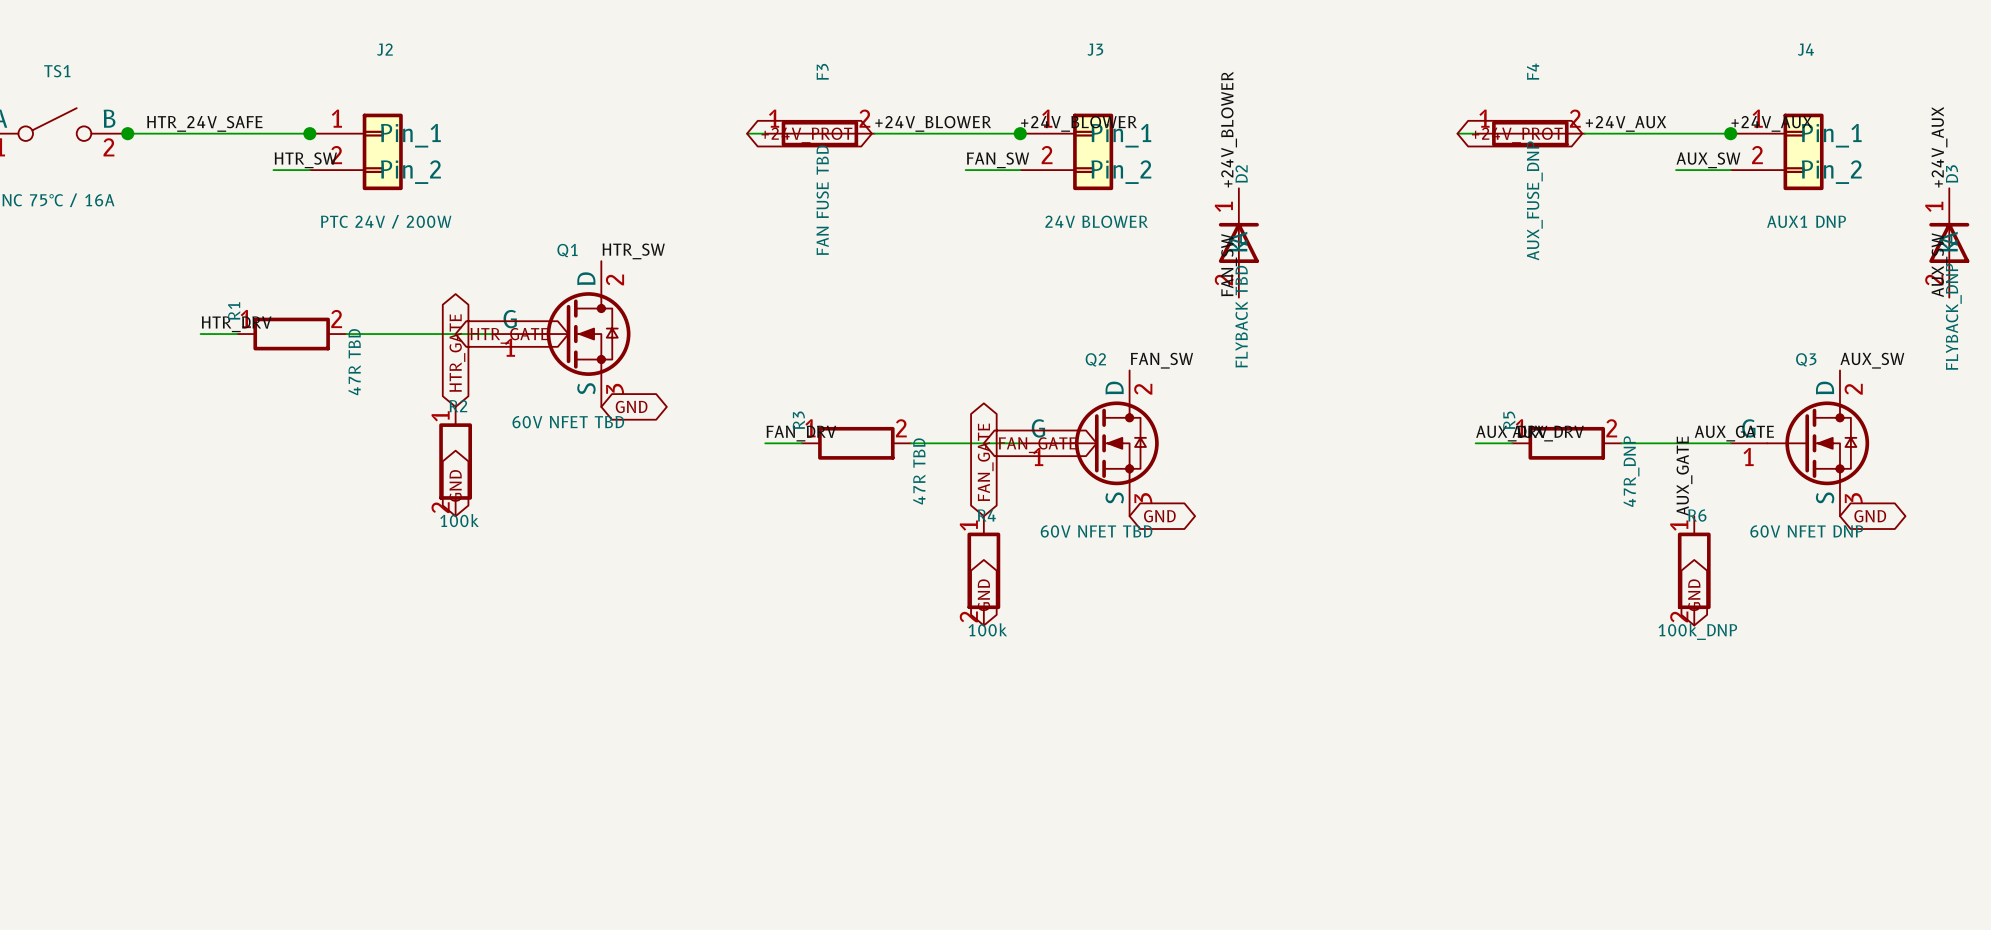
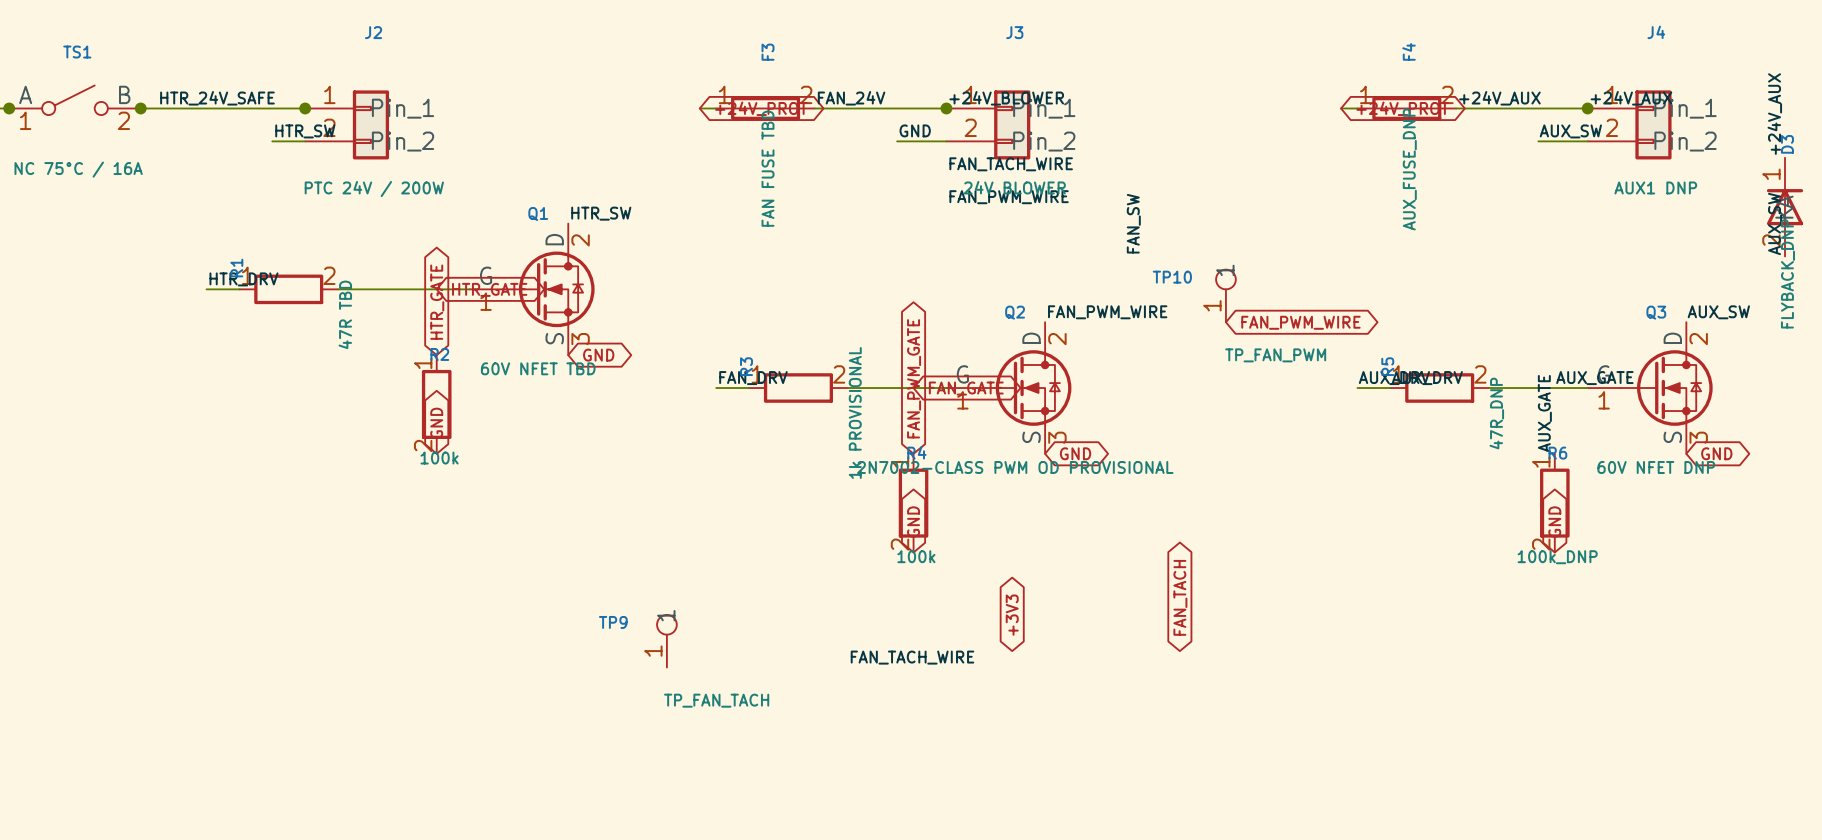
label: +24V_BLOWER (933, 123) -> FAN_24V (851, 98)
label: +24V_BLOWER (1229, 129) -> none
label: FAN_SW (998, 160) -> GND (915, 130)
label: none -> FAN_TACH_WIRE (1011, 164)
label: none -> FAN_PWM_WIRE (1009, 197)
D2: FLYBACK TBD (1238, 242) -> none
TP10: none -> TP_FAN_PWM (1225, 295)
label: FAN_SW (1161, 360) -> FAN_PWM_WIRE (1107, 312)
global label: none -> FAN_PWM_WIRE (1300, 322)
global label: FAN_GATE (985, 462) -> FAN_PWM_GATE (914, 378)
R3 value: 47R TBD (919, 471) -> 1k PROVISIONAL (855, 412)
Q2 value: 60V NFET TBD (1096, 531) -> 2N7002-CLASS PWM OD PROVISIONAL (1015, 467)
global label: none -> FAN_TACH (1180, 597)
global label: none -> +3V3 (1012, 615)
TP9: none -> TP_FAN_TACH (666, 641)
label: none -> FAN_TACH_WIRE (912, 657)

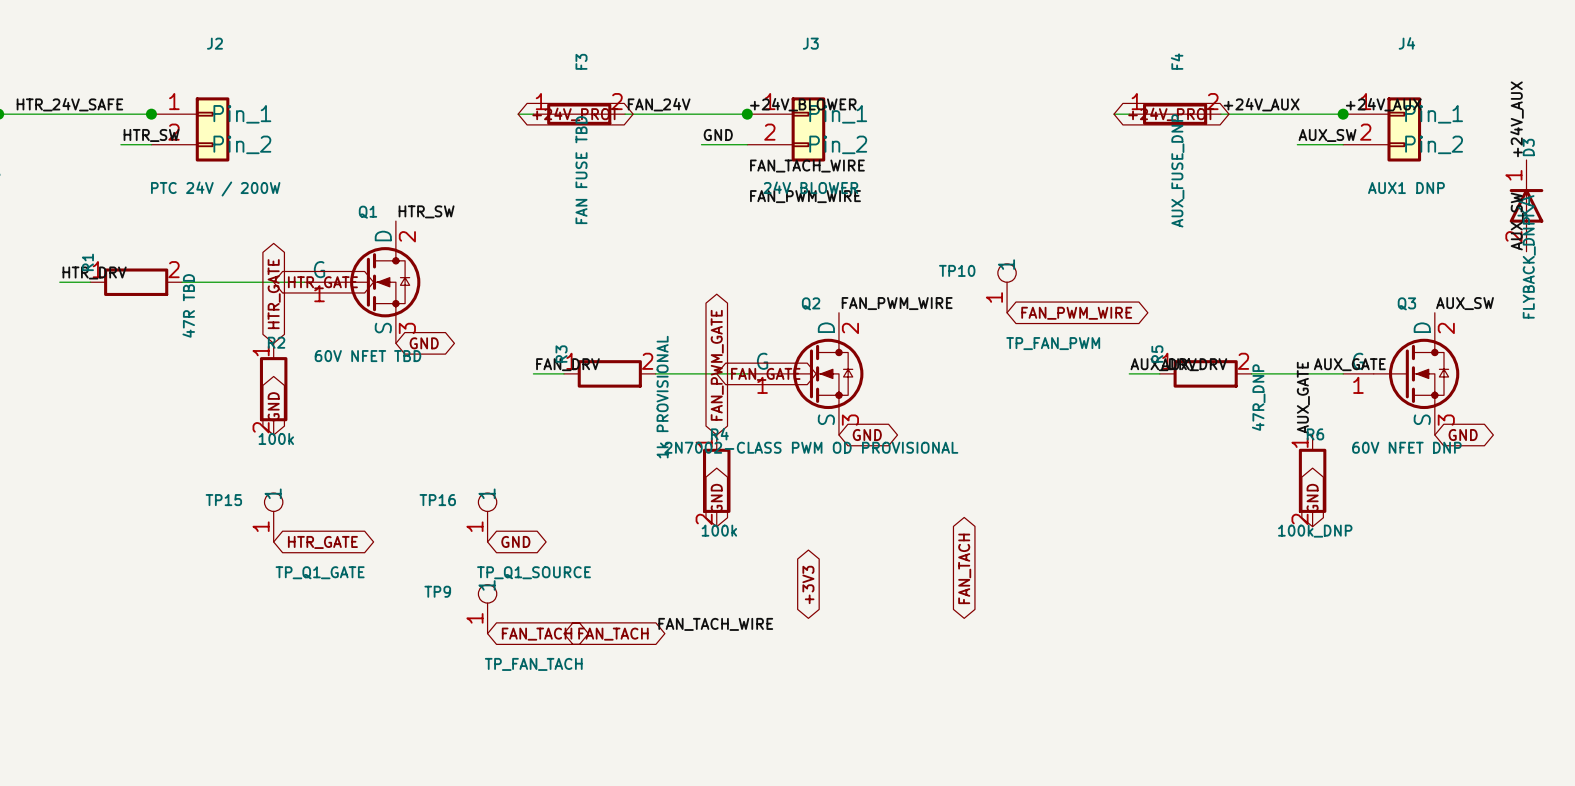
label: FAN_SW (1133, 223) -> none
TP15: none -> TP_Q1_GATE (273, 517)
TP16: none -> TP_Q1_SOURCE (487, 517)
global label: none -> GND (515, 541)
global label: none -> HTR_GATE (322, 542)
global label: none -> FAN_TACH (537, 634)
global label: none -> FAN_TACH (613, 634)

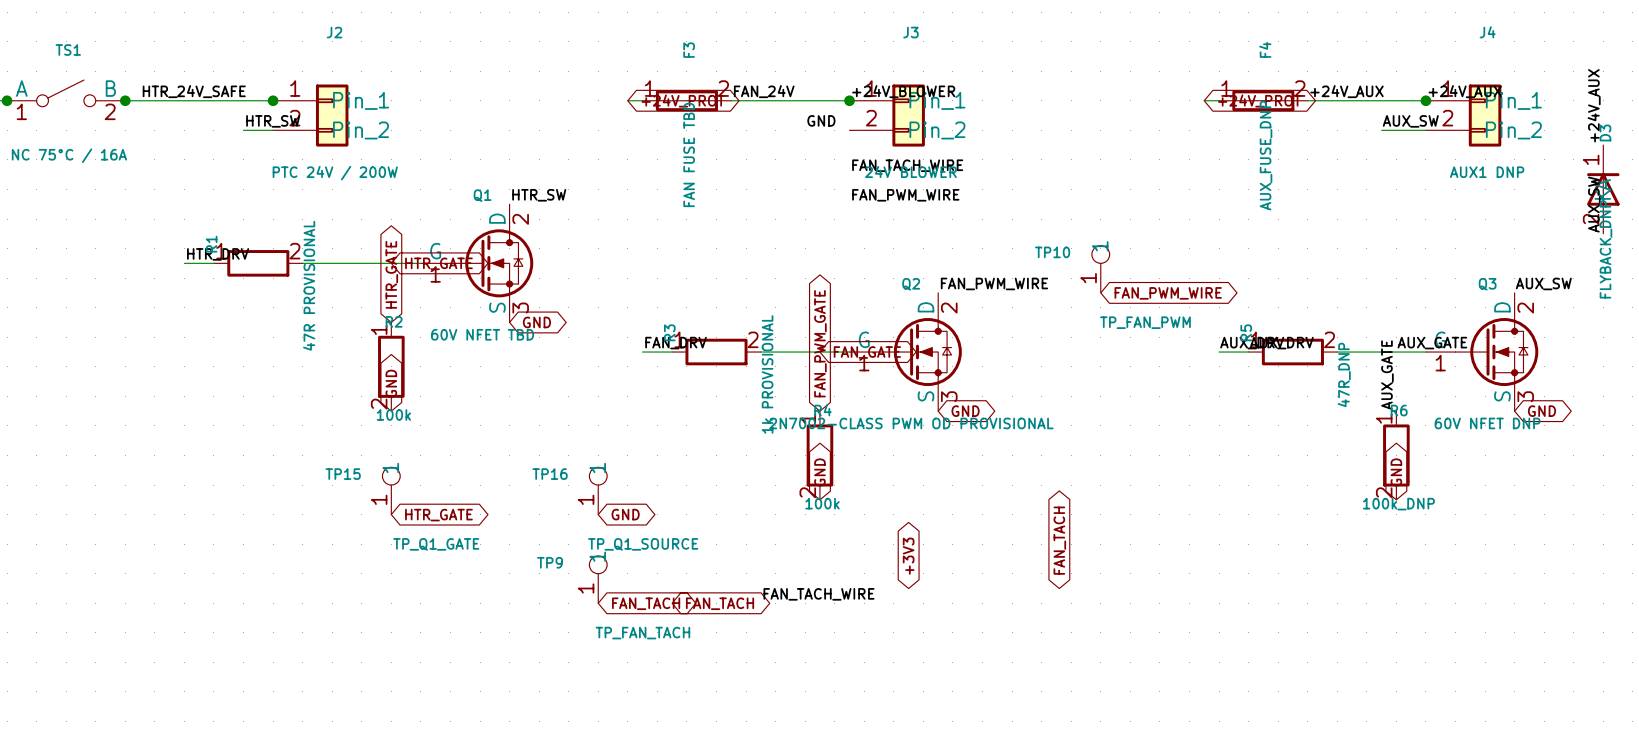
wire: (701, 144) (747, 144) -> none
label position: FAN_TACH_WIRE (807, 166) -> FAN_TACH_WIRE (907, 165)
label position: FAN_PWM_WIRE (805, 196) -> FAN_PWM_WIRE (905, 195)
R1 value: 47R TBD (188, 305) -> 47R PROVISIONAL (309, 285)

